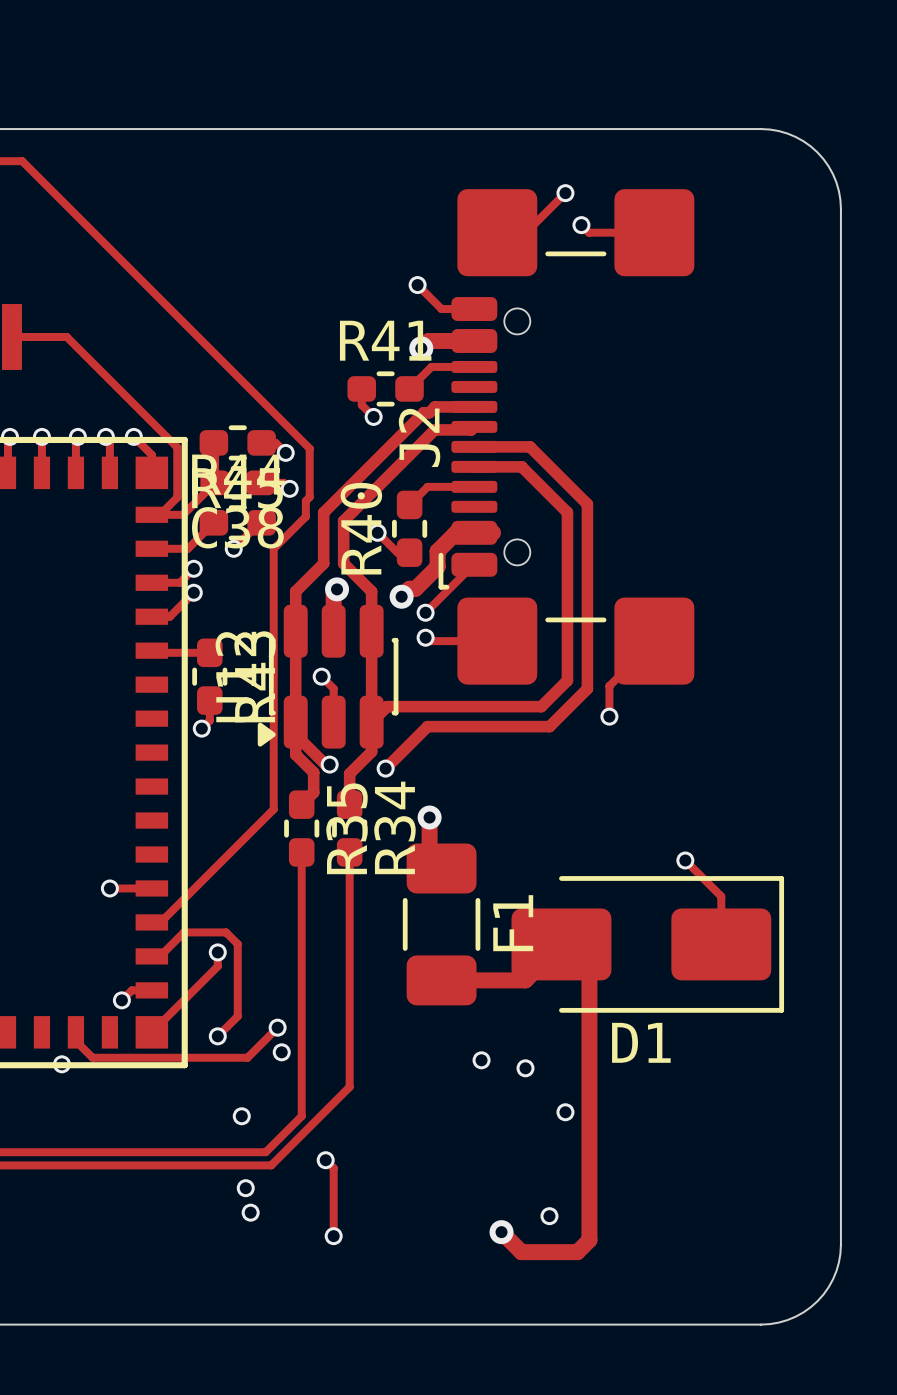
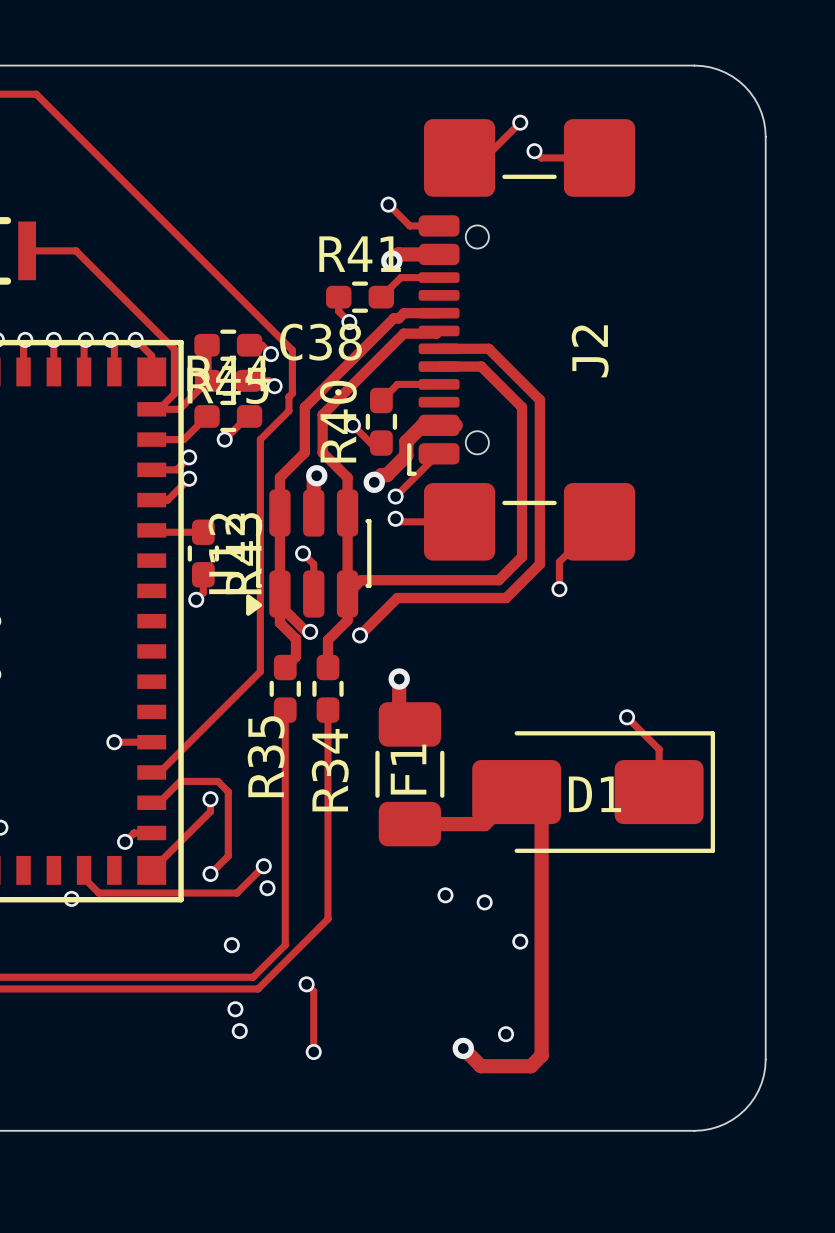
J2 name position: J2 (419, 437) -> J2 (590, 351)
C38 name position: C38 (237, 527) -> C38 (320, 342)
R34 name position: R34 (394, 827) -> R34 (330, 770)
R35 name position: R35 (347, 828) -> R35 (266, 756)
F1 name position: F1 (513, 923) -> F1 (408, 769)
D1 name position: D1 (641, 1042) -> D1 (595, 794)

